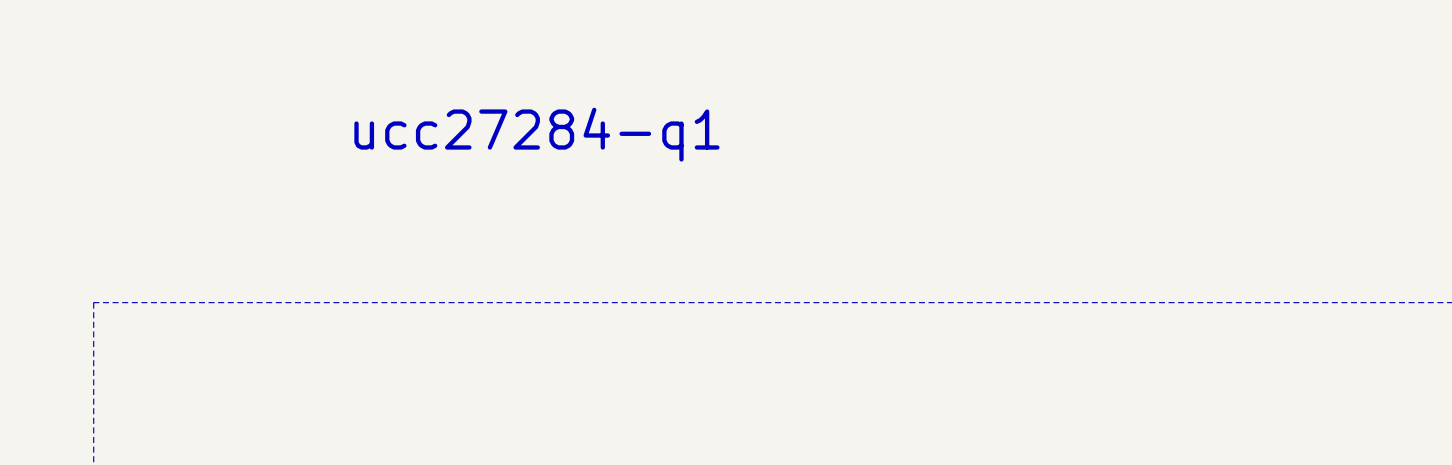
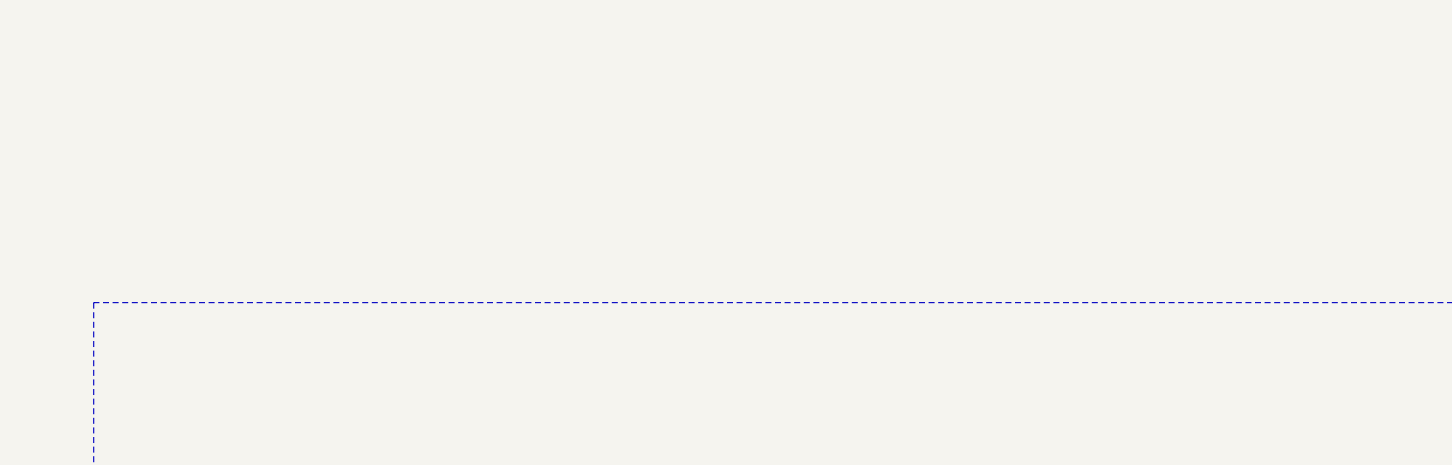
text: ucc27284-q1 (536, 134) -> none

